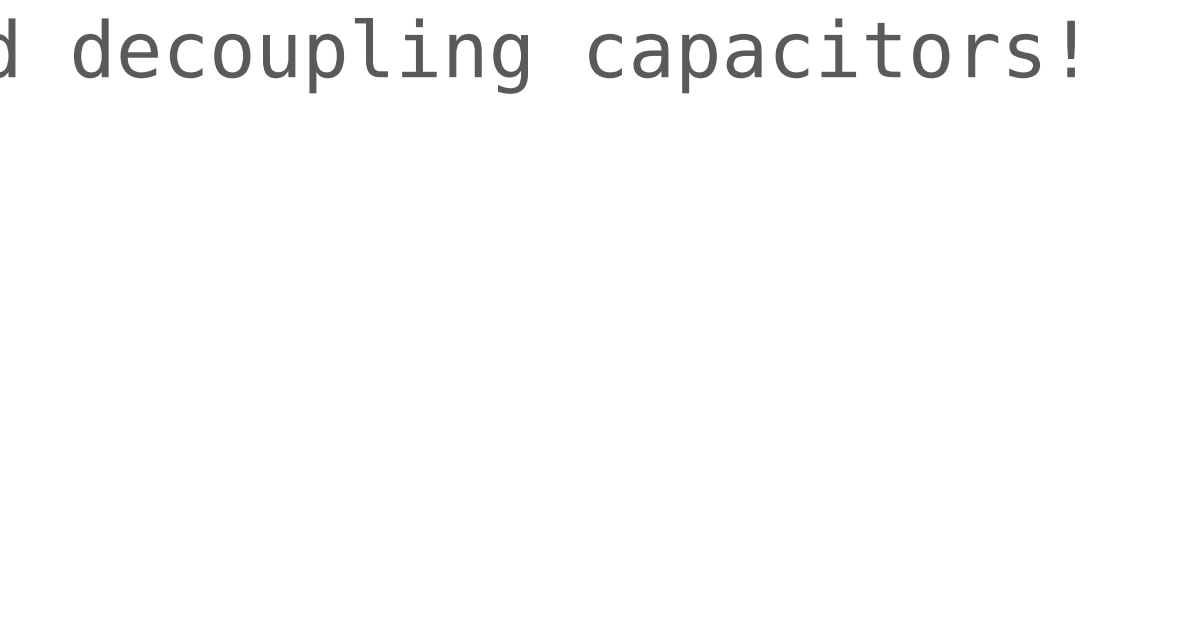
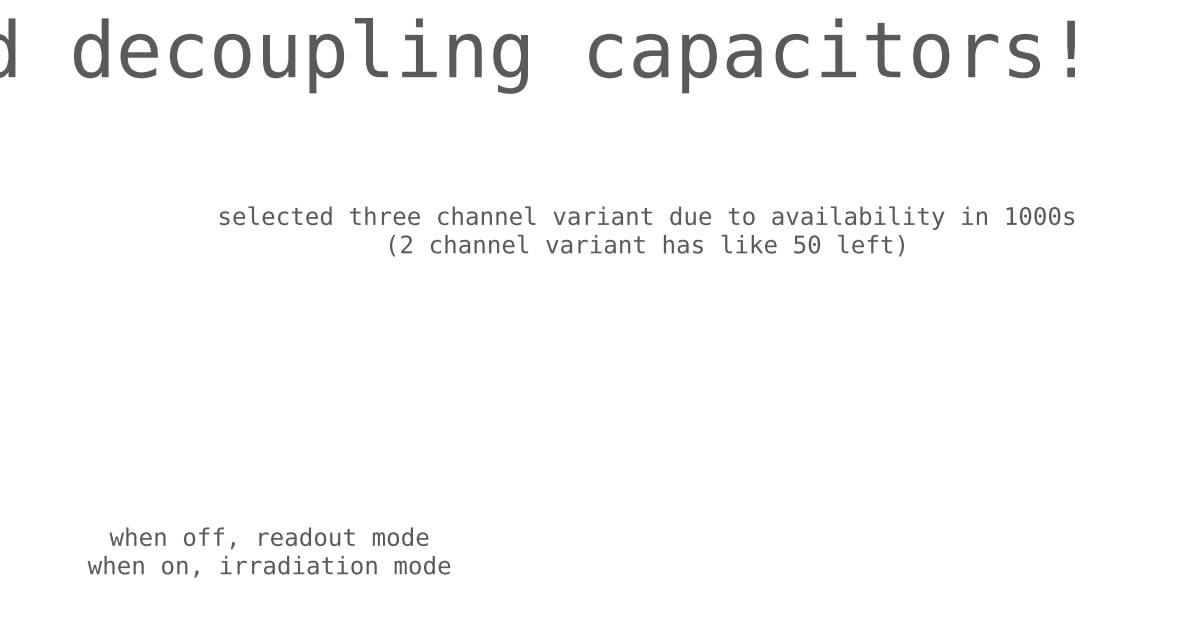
text: none -> selected three channel variant due to availability in 1000s (647, 218)
text: none -> (2 channel variant has like 50 left) (646, 245)
text: none -> when off, readout mode (268, 538)
text: none -> when on, irradiation mode (268, 566)

